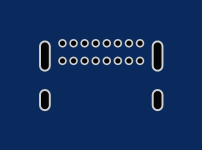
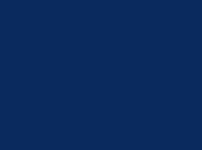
part: (101, 75) -> none

